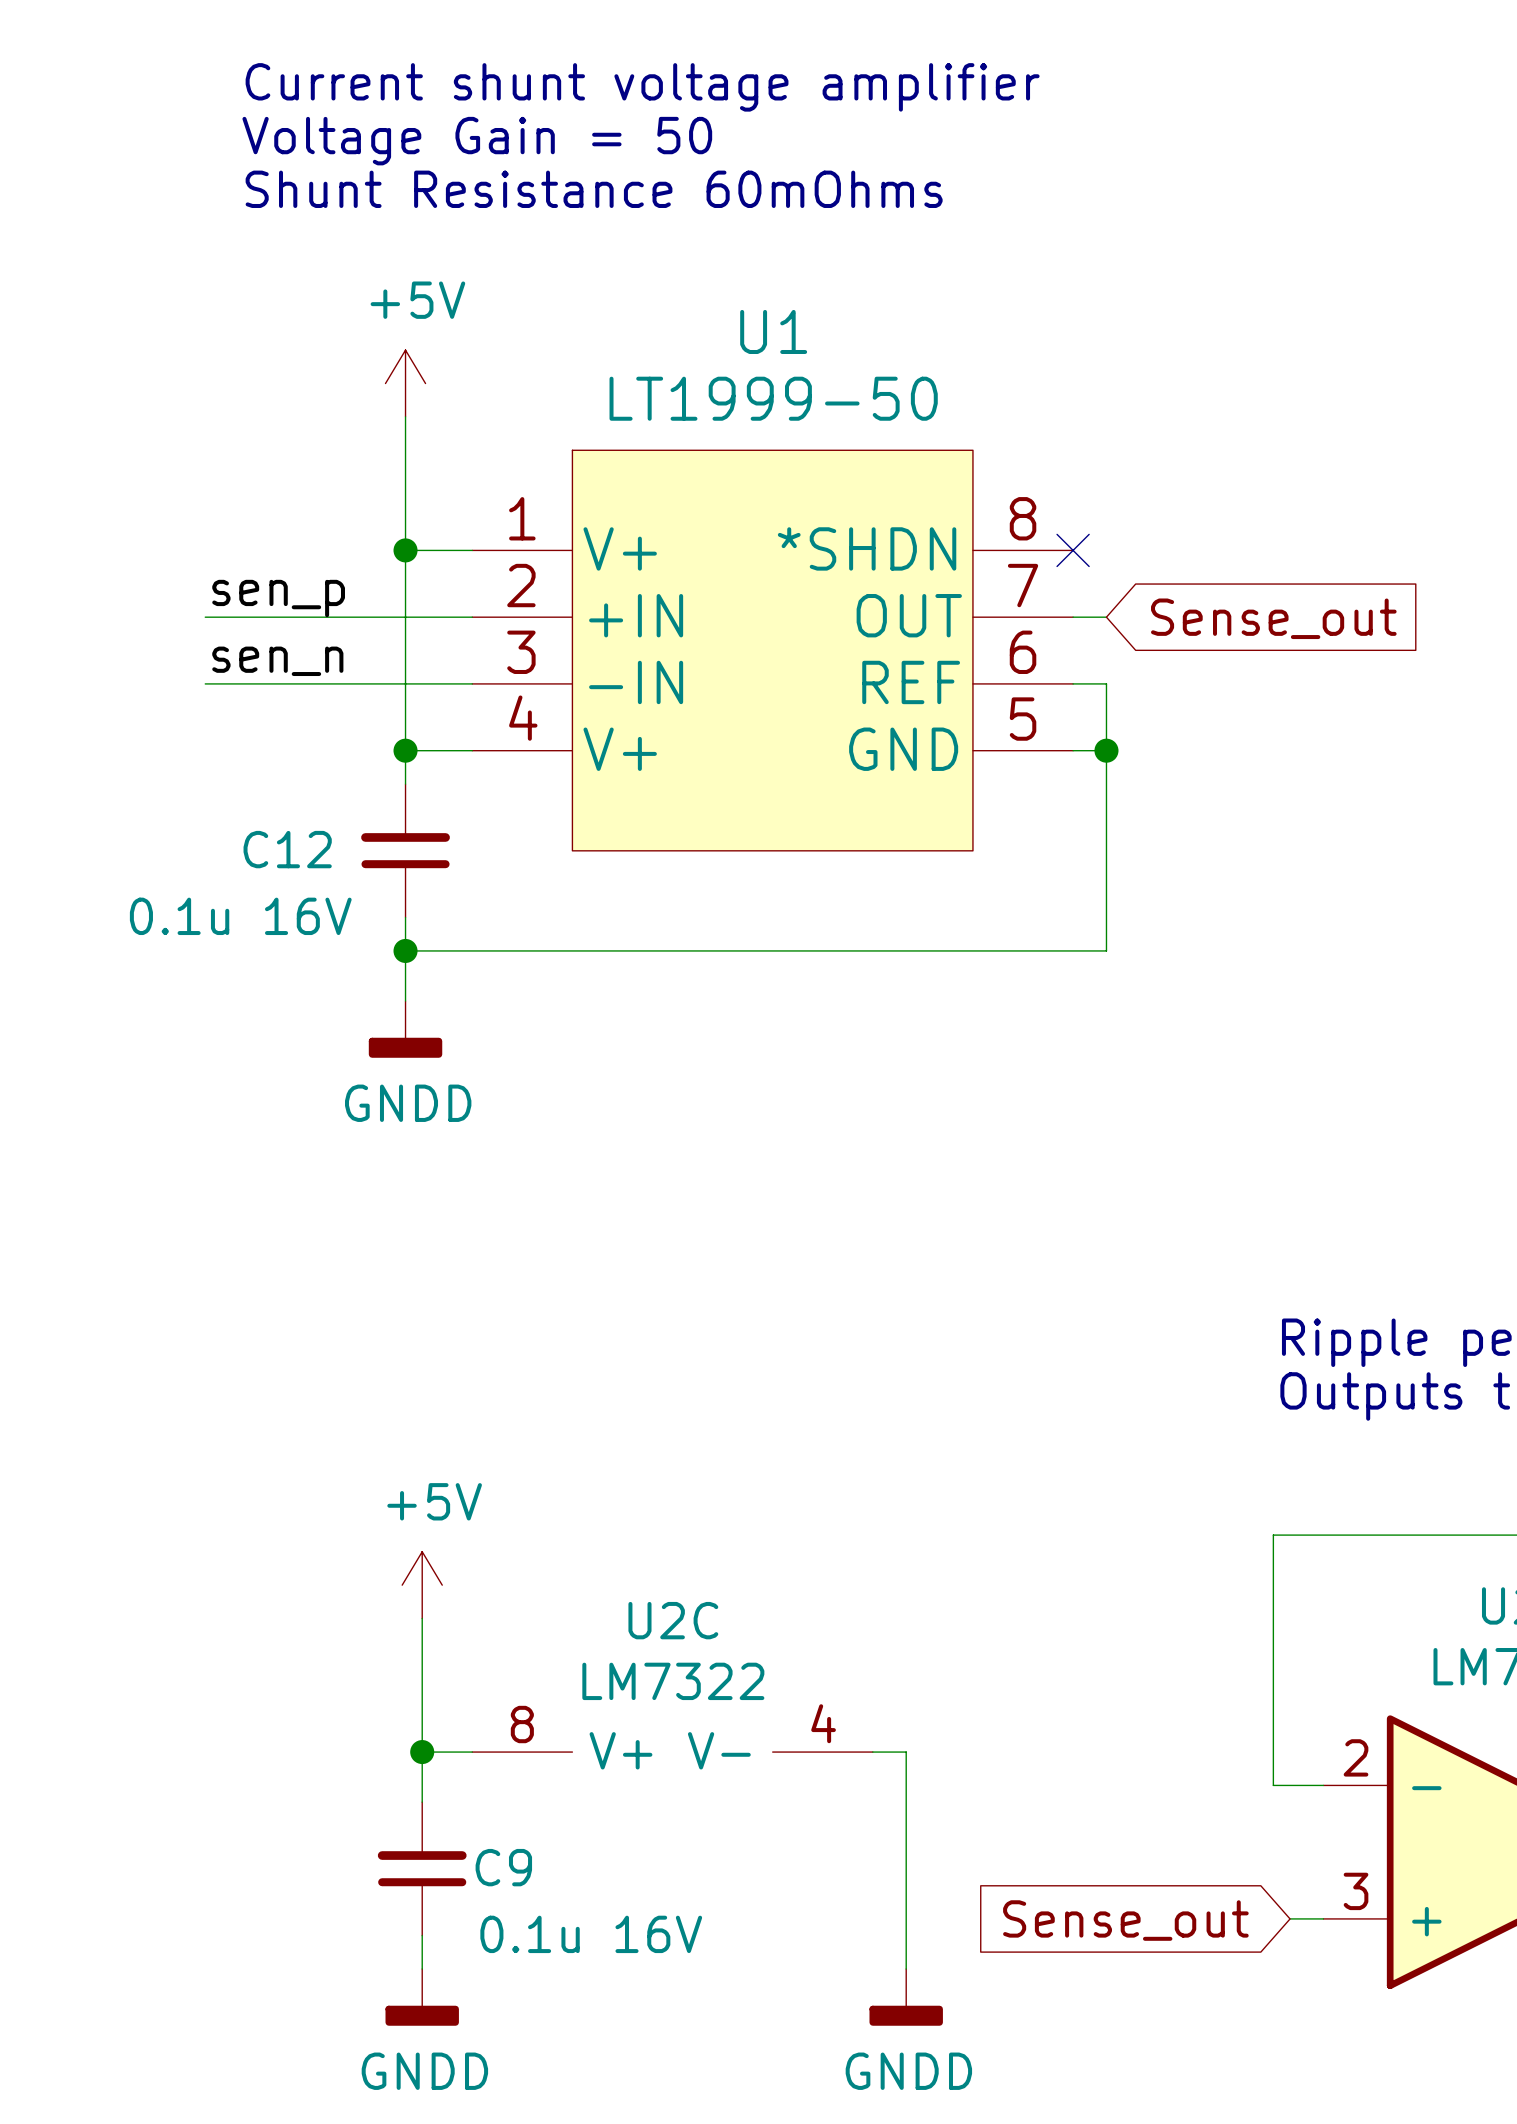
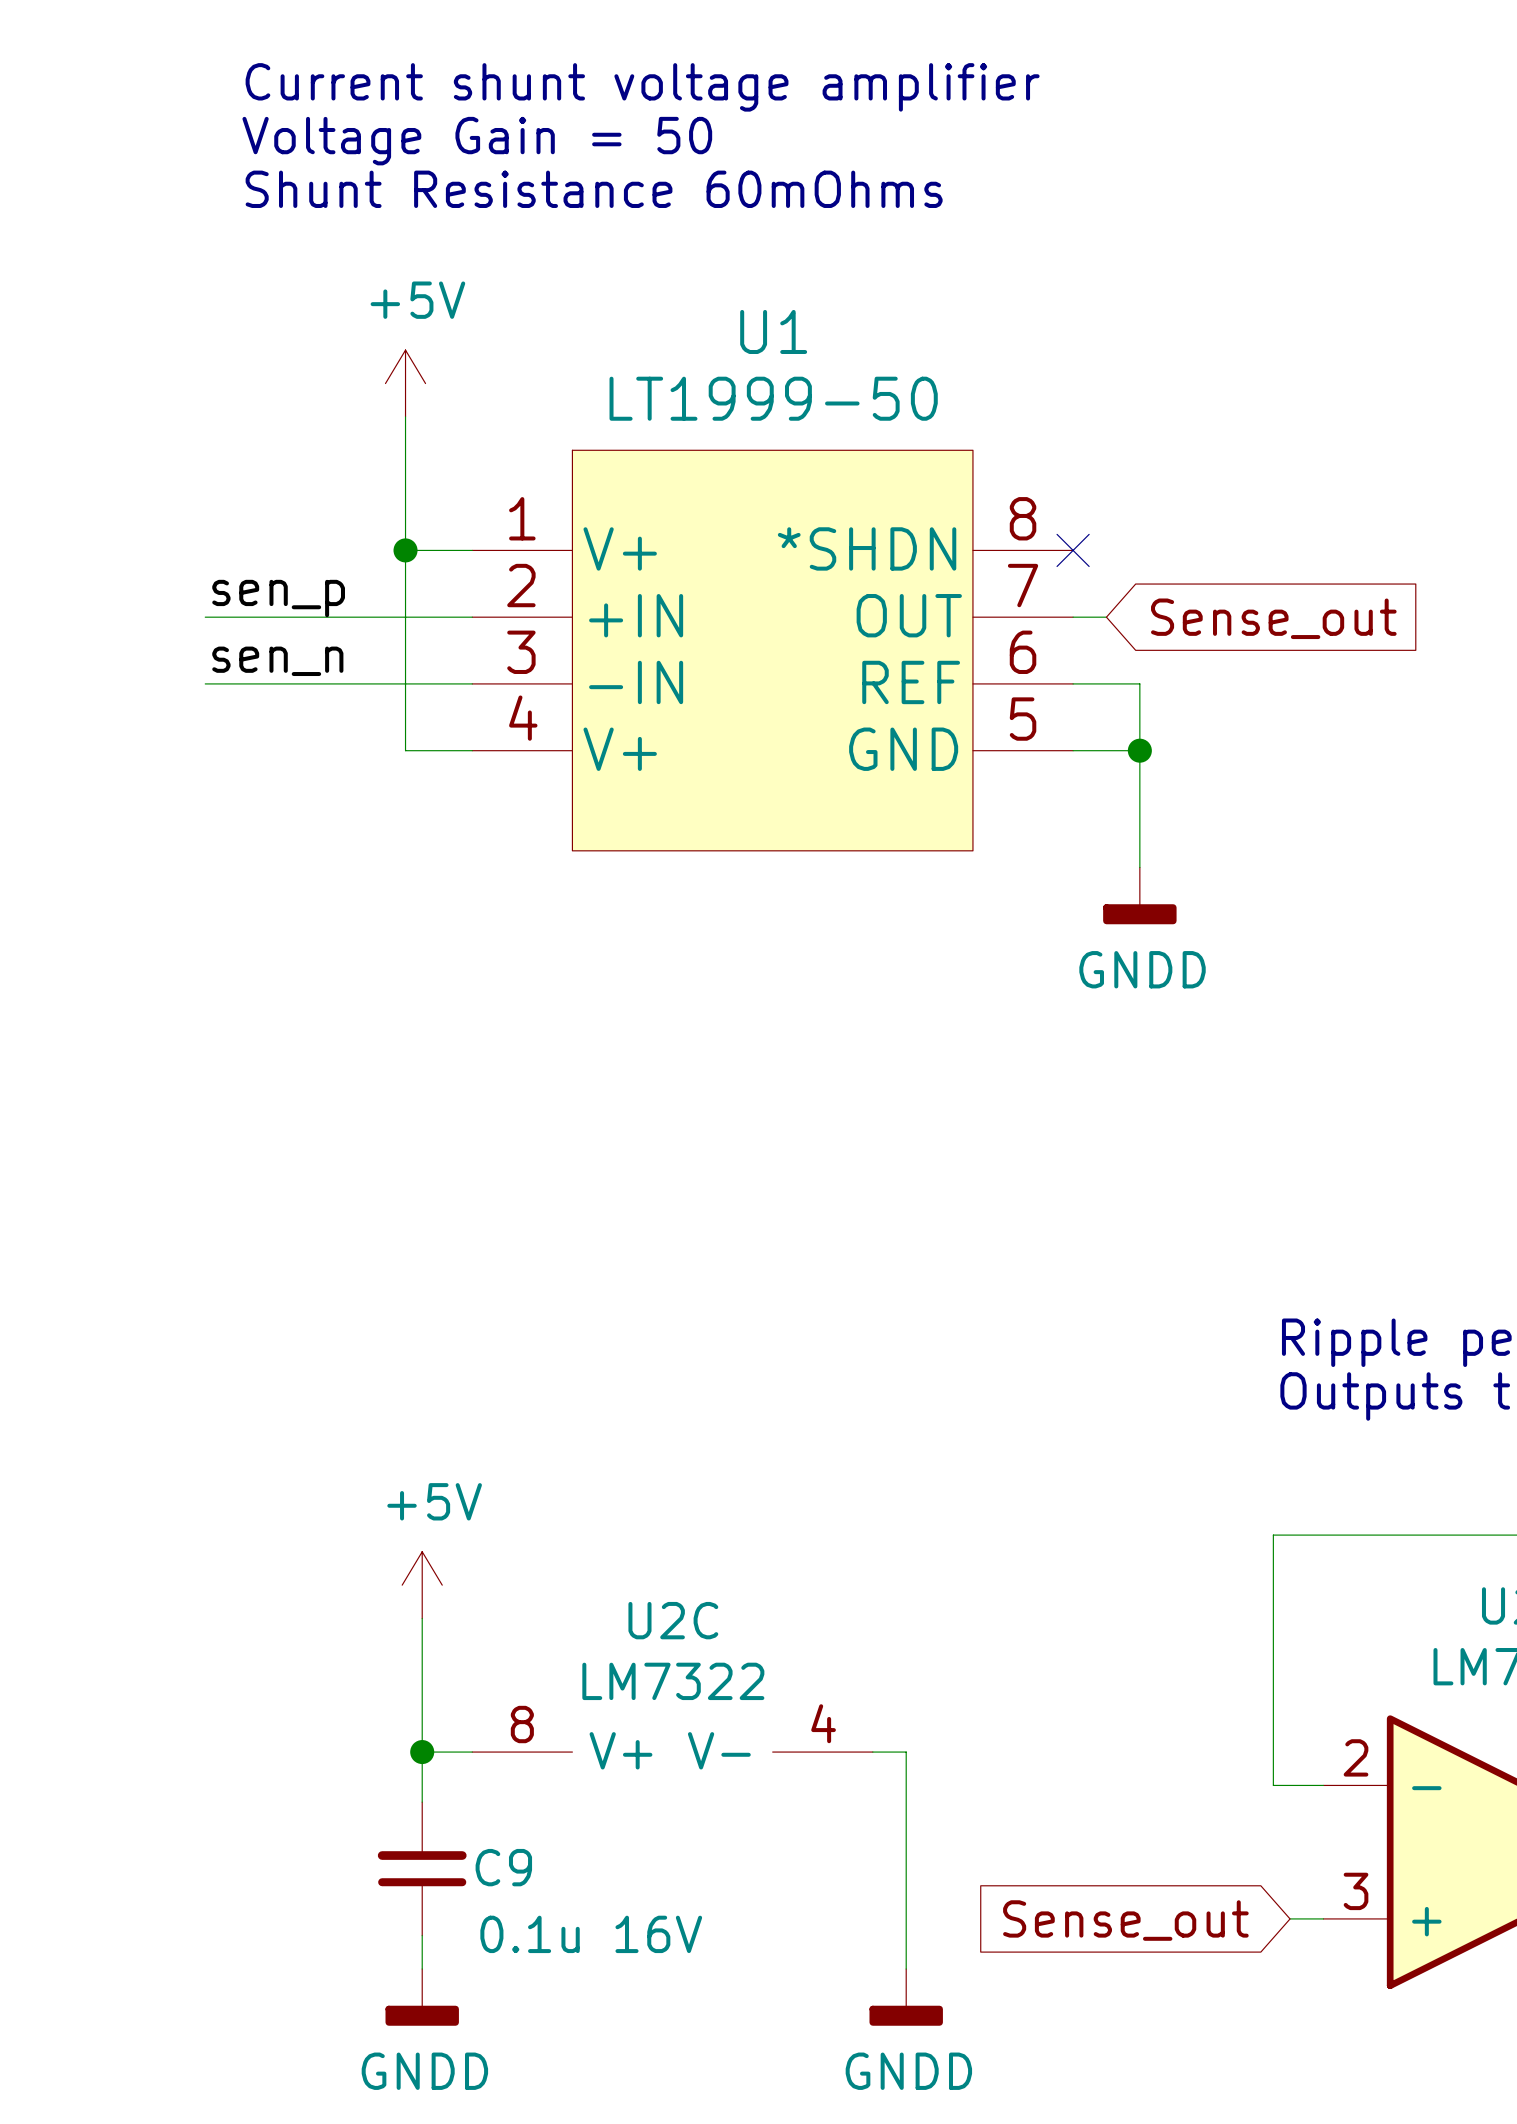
wire: (1106, 683) (1106, 950) (405, 950) -> (1106, 683) (1139, 683) (1139, 867)
wire: (405, 750) (405, 784) -> none
junction: (405, 750) -> none
wire: none -> (1106, 750) (1139, 750)
junction position: (1106, 750) -> (1139, 750)
C12: 0.1u 16V (405, 850) -> none
power symbol: none -> GNDD (1139, 895)
wire: (405, 917) (405, 1001) -> none
junction: (405, 950) -> none
power symbol: GNDD (405, 1029) -> none

